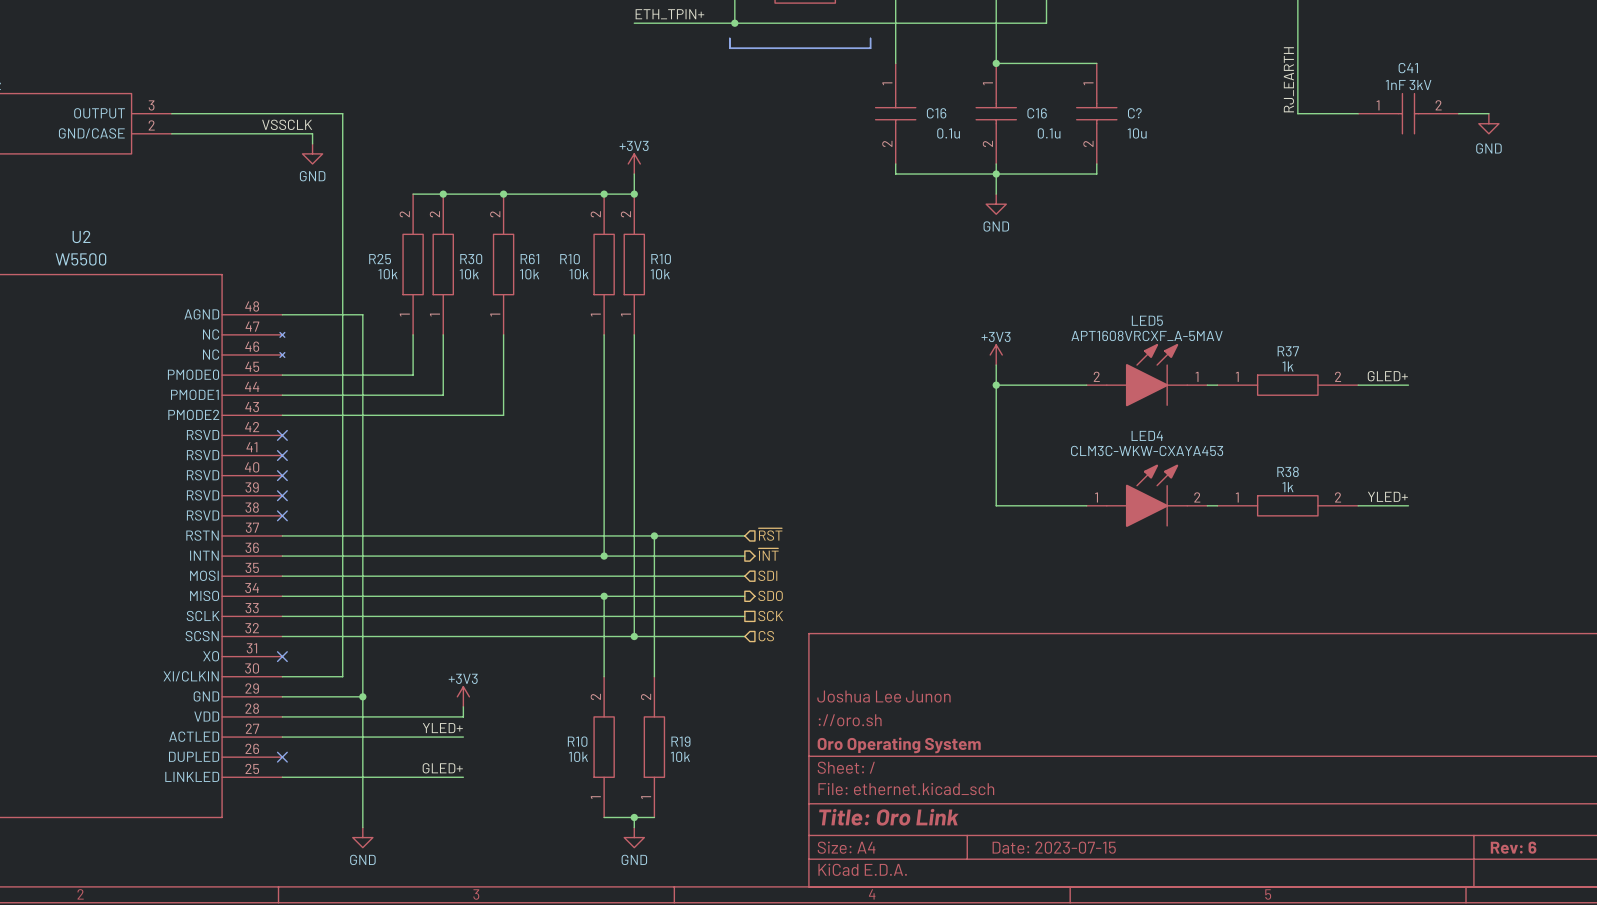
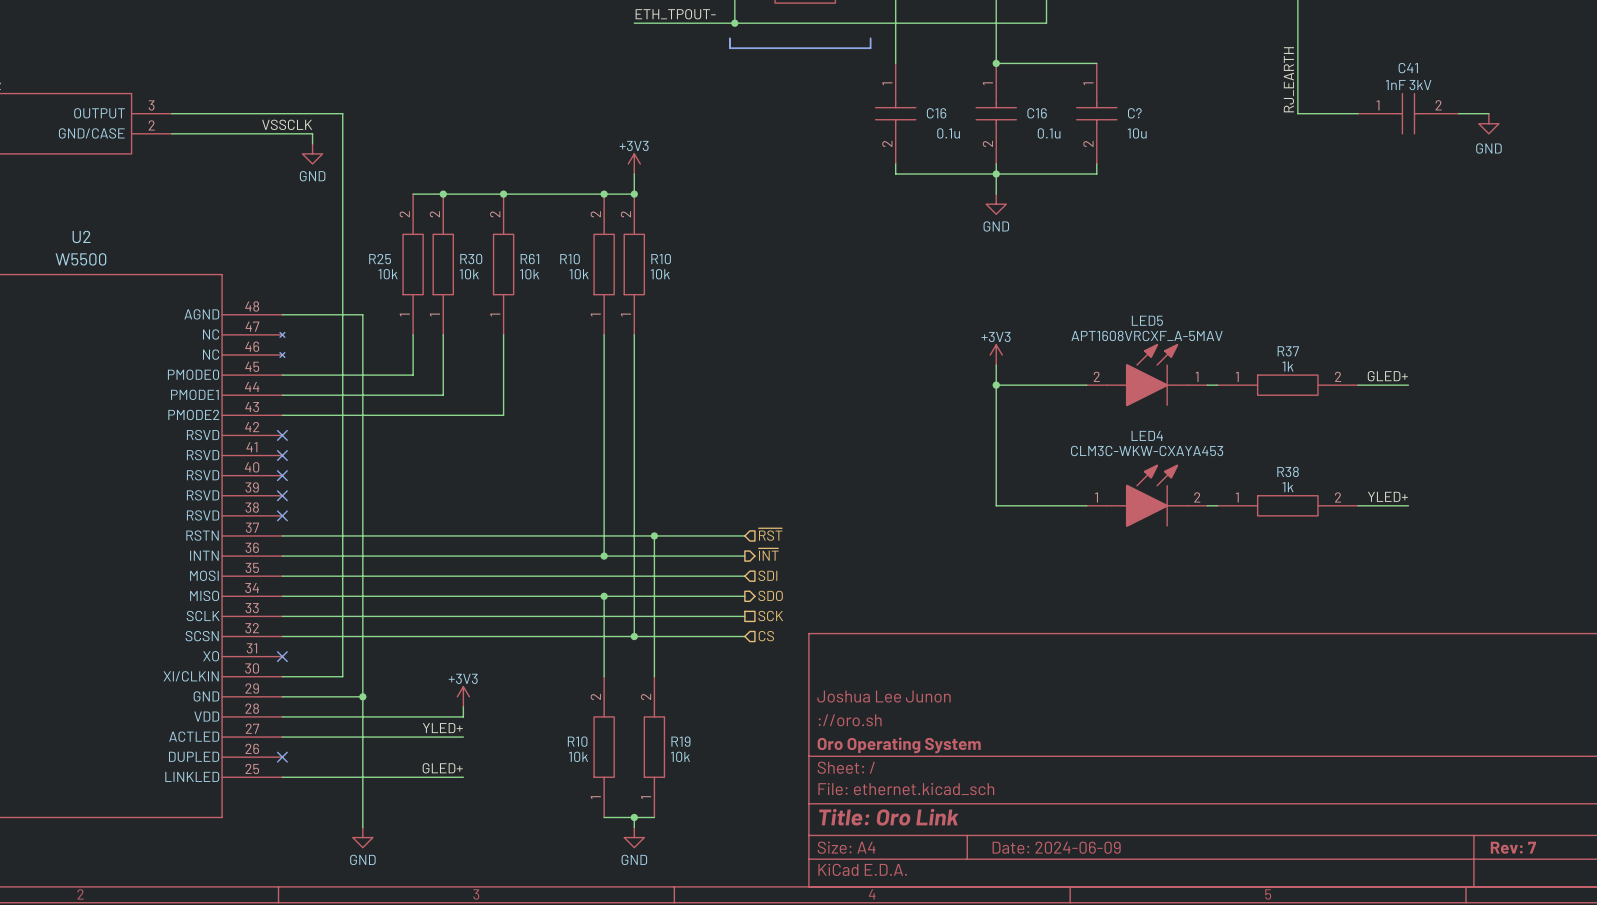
label: ETH_TPIN+ (669, 14) -> ETH_TPOUT- (675, 14)
title block: Date: 2023-07-15 (1054, 847) -> Date: 2024-06-09 (1056, 847)
title block: Rev: 6 (1513, 847) -> Rev: 7 (1513, 847)

